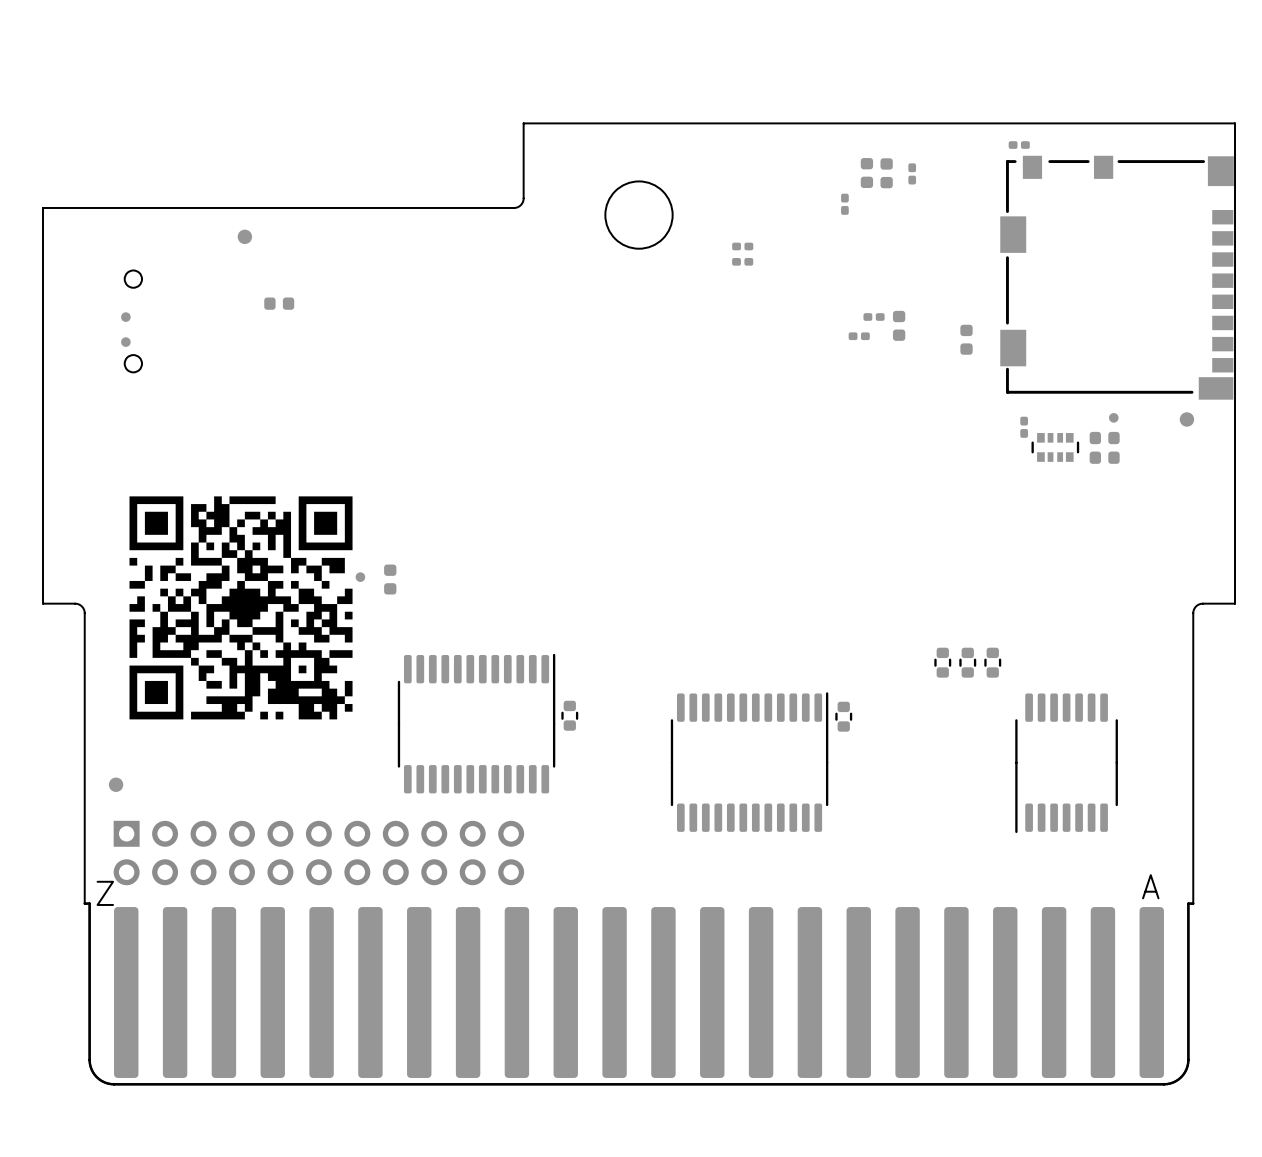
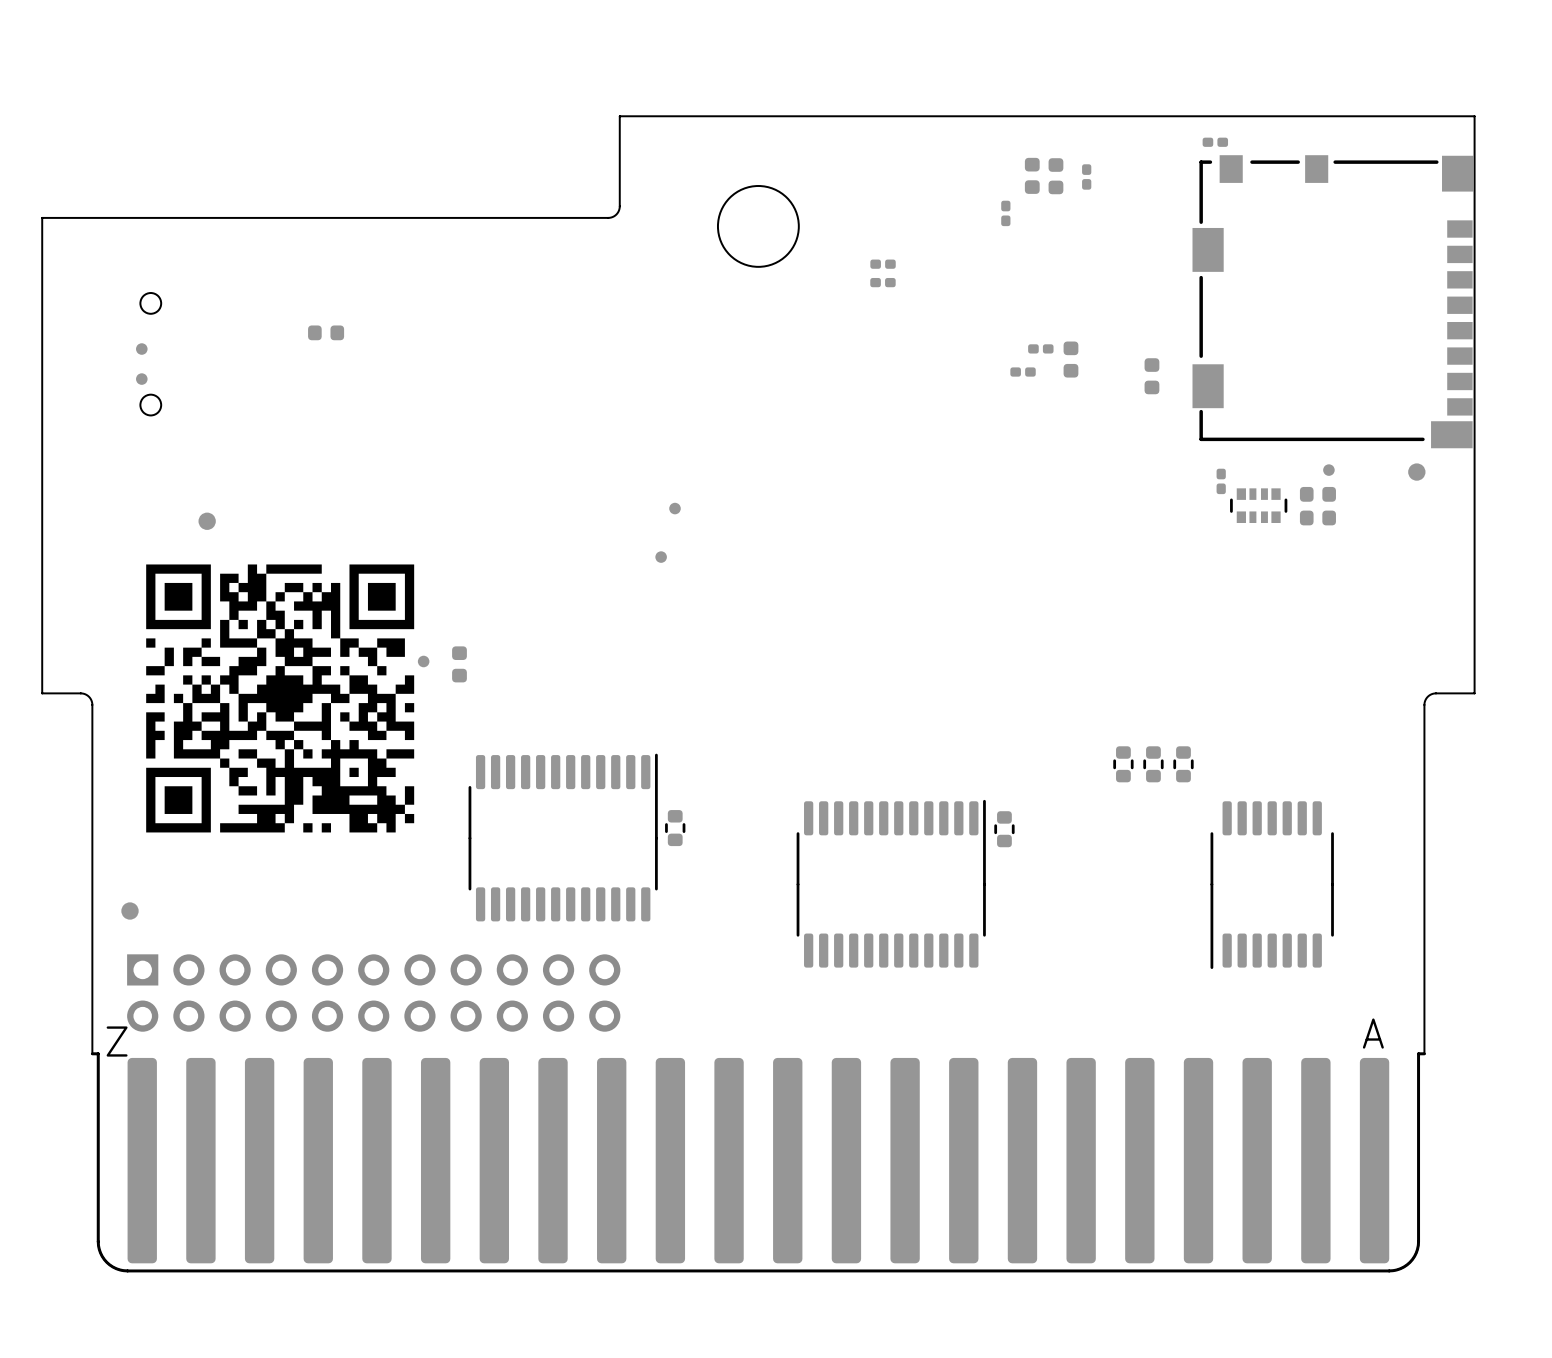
part position: (244, 236) -> (207, 521)
part: none -> (674, 508)
part: none -> (661, 557)

